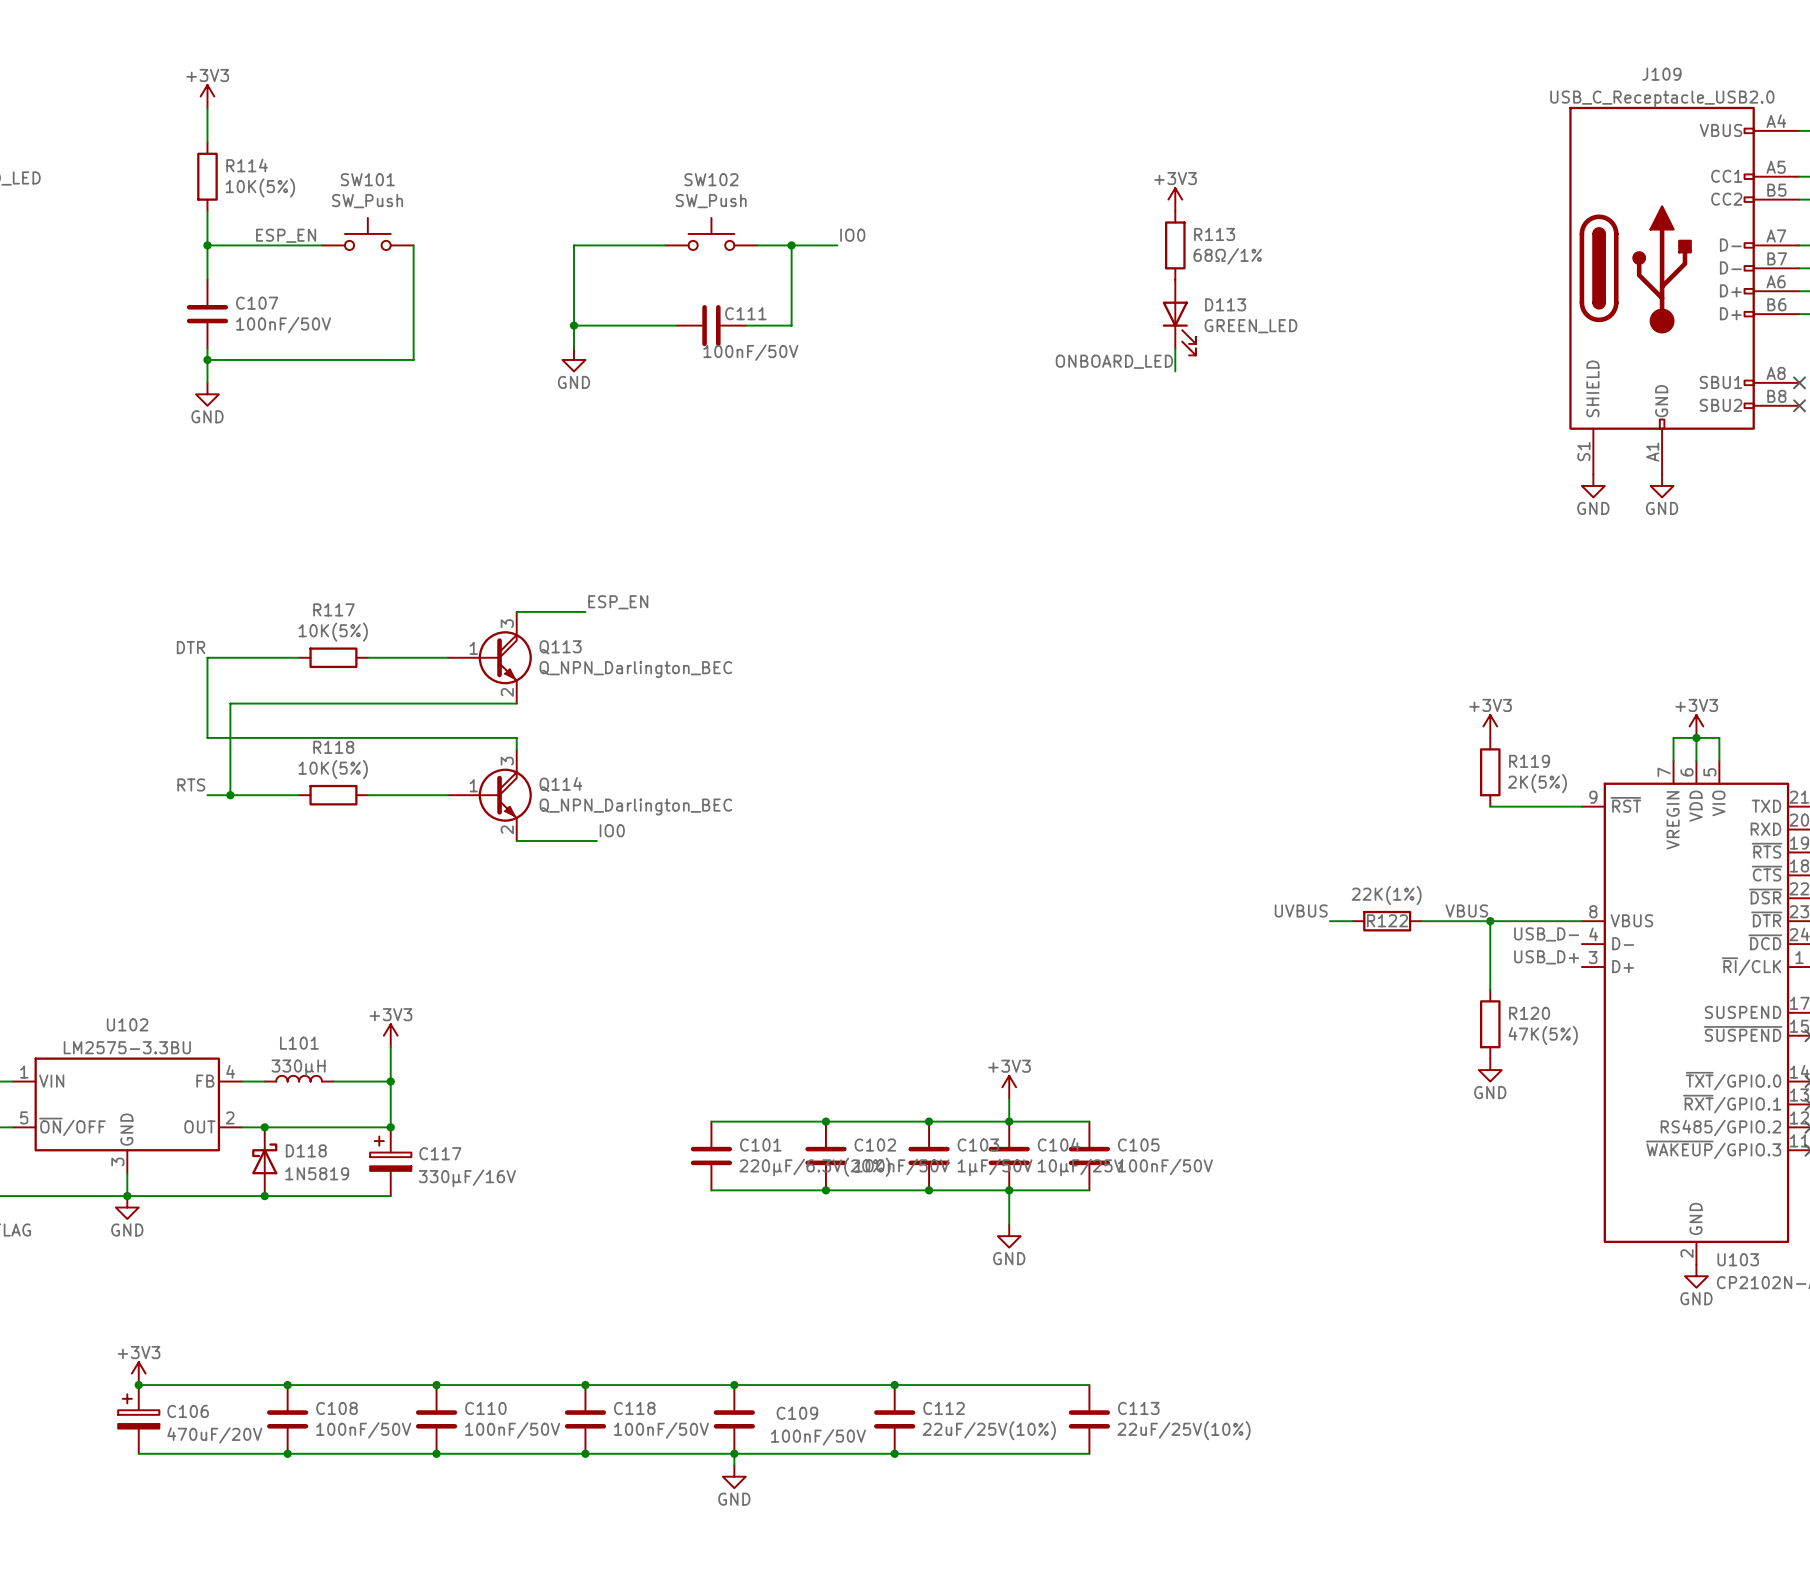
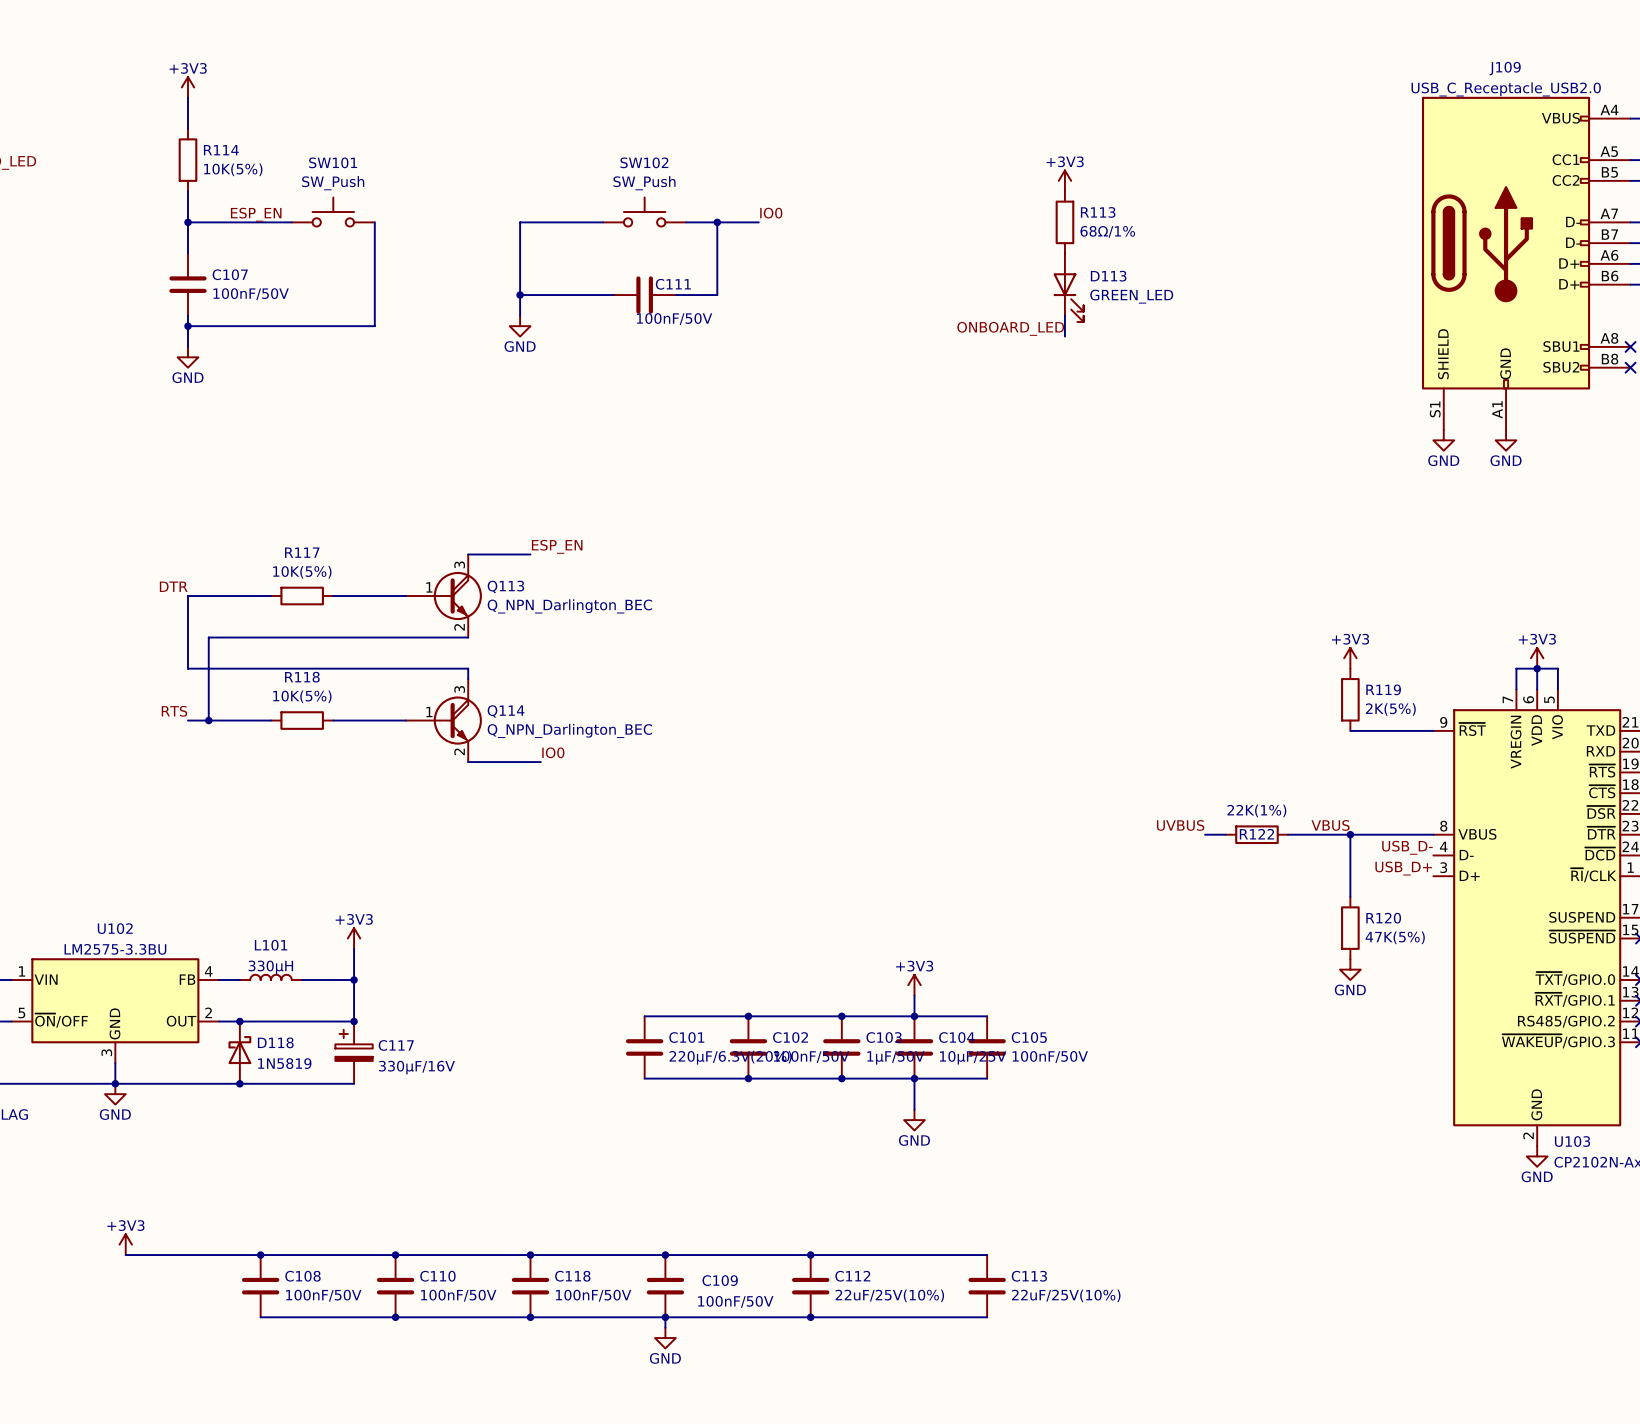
junction: (138, 1385) -> none
C106: 470uF/20V (138, 1419) -> none
wire: (138, 1453) (287, 1453) -> none
junction: (287, 1453) -> none

